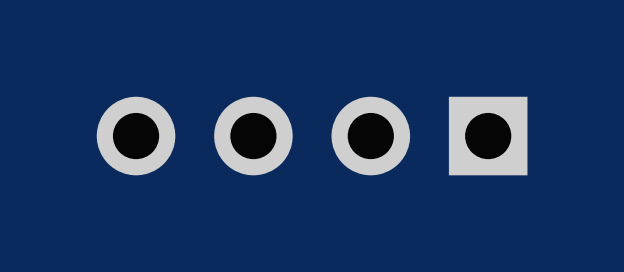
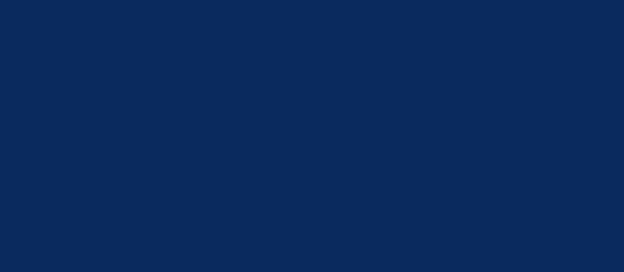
part: (312, 136) -> none

